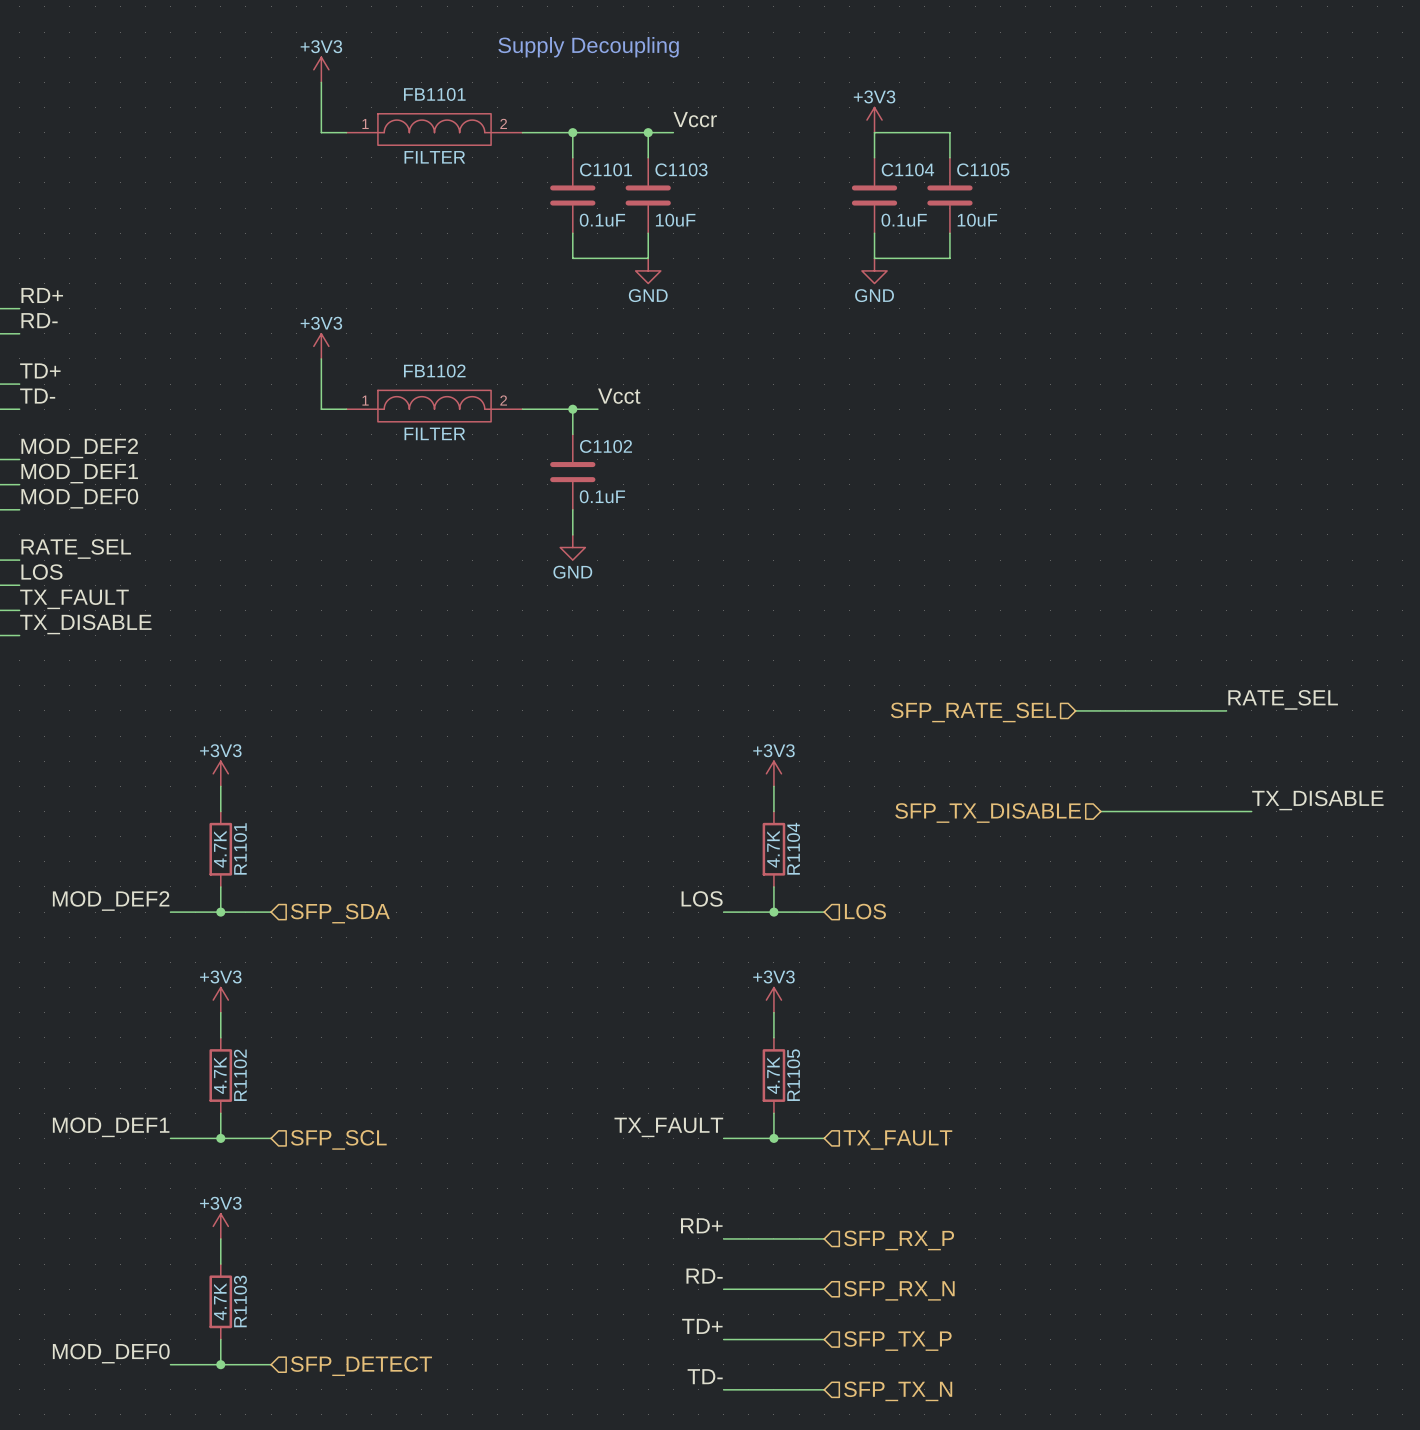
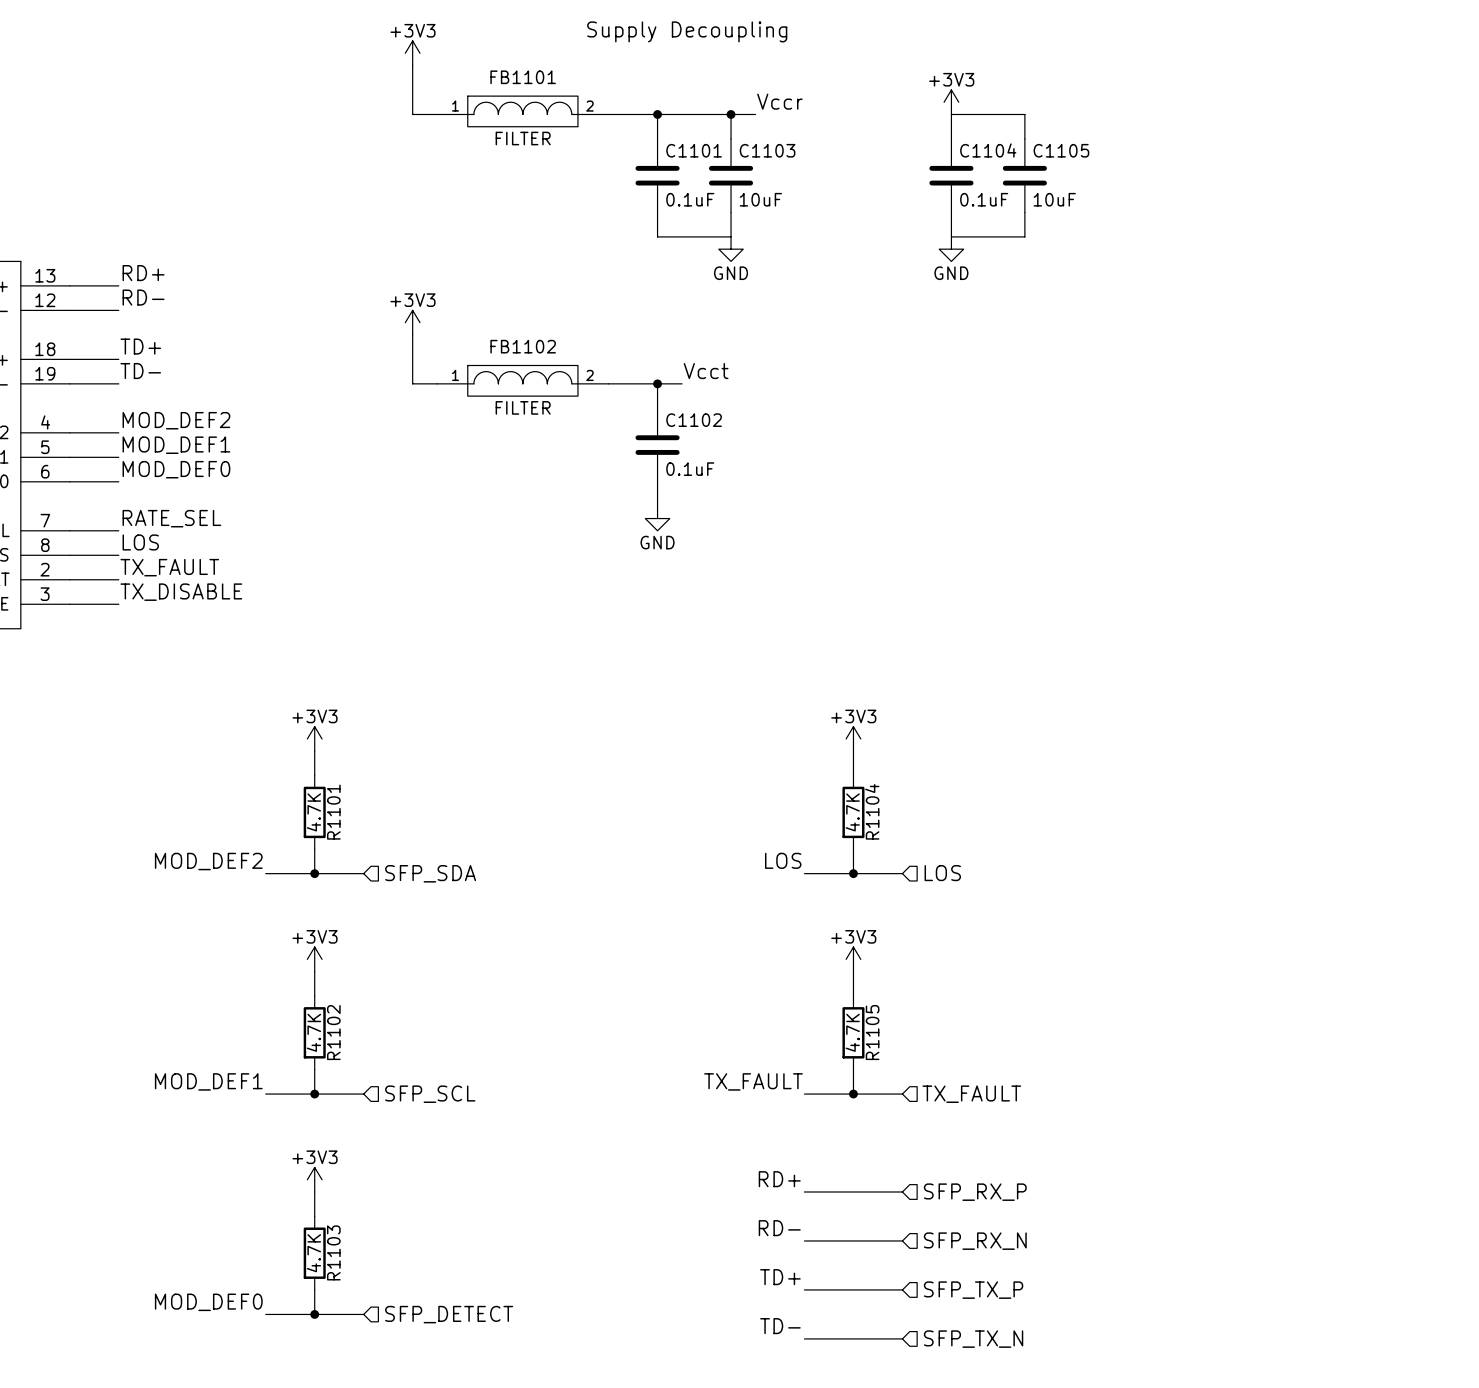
label: RATE_SEL (1283, 699) -> none
wire: (1075, 710) (1226, 710) -> none
hierarchical label: SFP_RATE_SEL (973, 712) -> none
label: TX_DISABLE (1317, 800) -> none
wire: (1100, 811) (1251, 811) -> none
hierarchical label: SFP_TX_DISABLE (988, 813) -> none

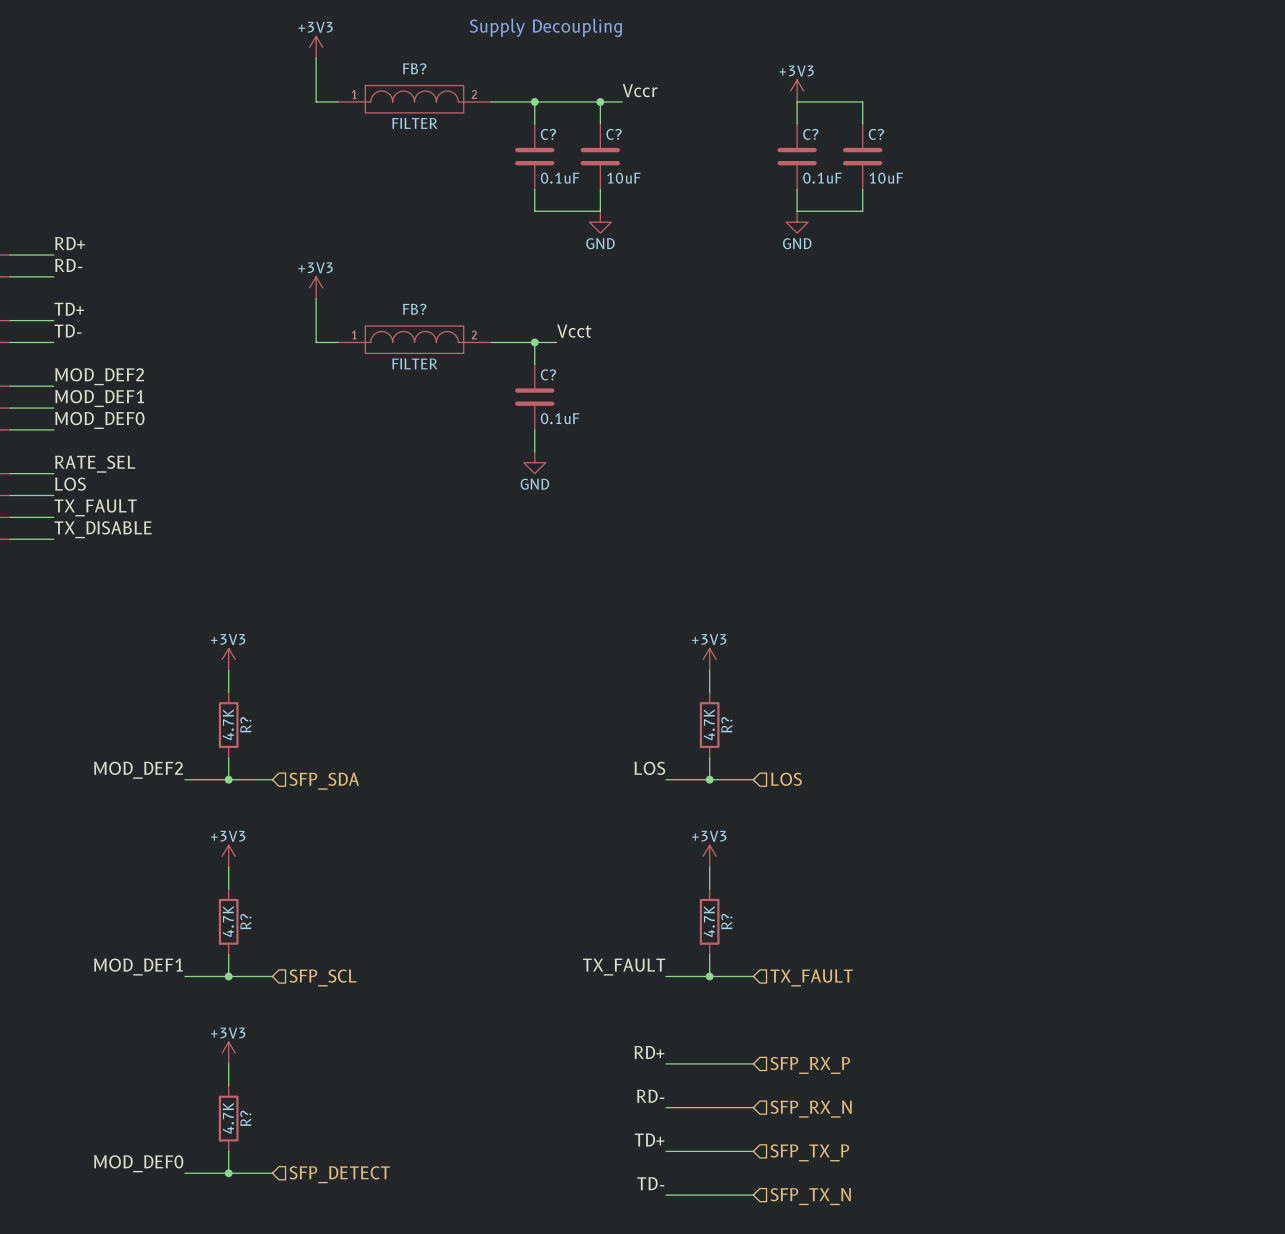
FB1101 name: FB1101 (523, 77) -> FB? (414, 68)
C1101 name: C1101 (694, 150) -> C? (548, 134)
C1103 name: C1103 (767, 150) -> C? (614, 134)
C1104 name: C1104 (988, 150) -> C? (810, 134)
C1105 name: C1105 (1061, 150) -> C? (876, 134)
FB1102 name: FB1102 (523, 346) -> FB? (414, 309)
C1102 name: C1102 (694, 420) -> C? (548, 374)
R1104 name: R1104 (872, 811) -> R? (726, 724)
R1101 name: R1101 (333, 812) -> R? (245, 724)
R1102 name: R1102 (333, 1032) -> R? (245, 921)
R1105 name: R1105 (872, 1032) -> R? (726, 921)
R1103 name: R1103 (333, 1252) -> R? (245, 1118)

